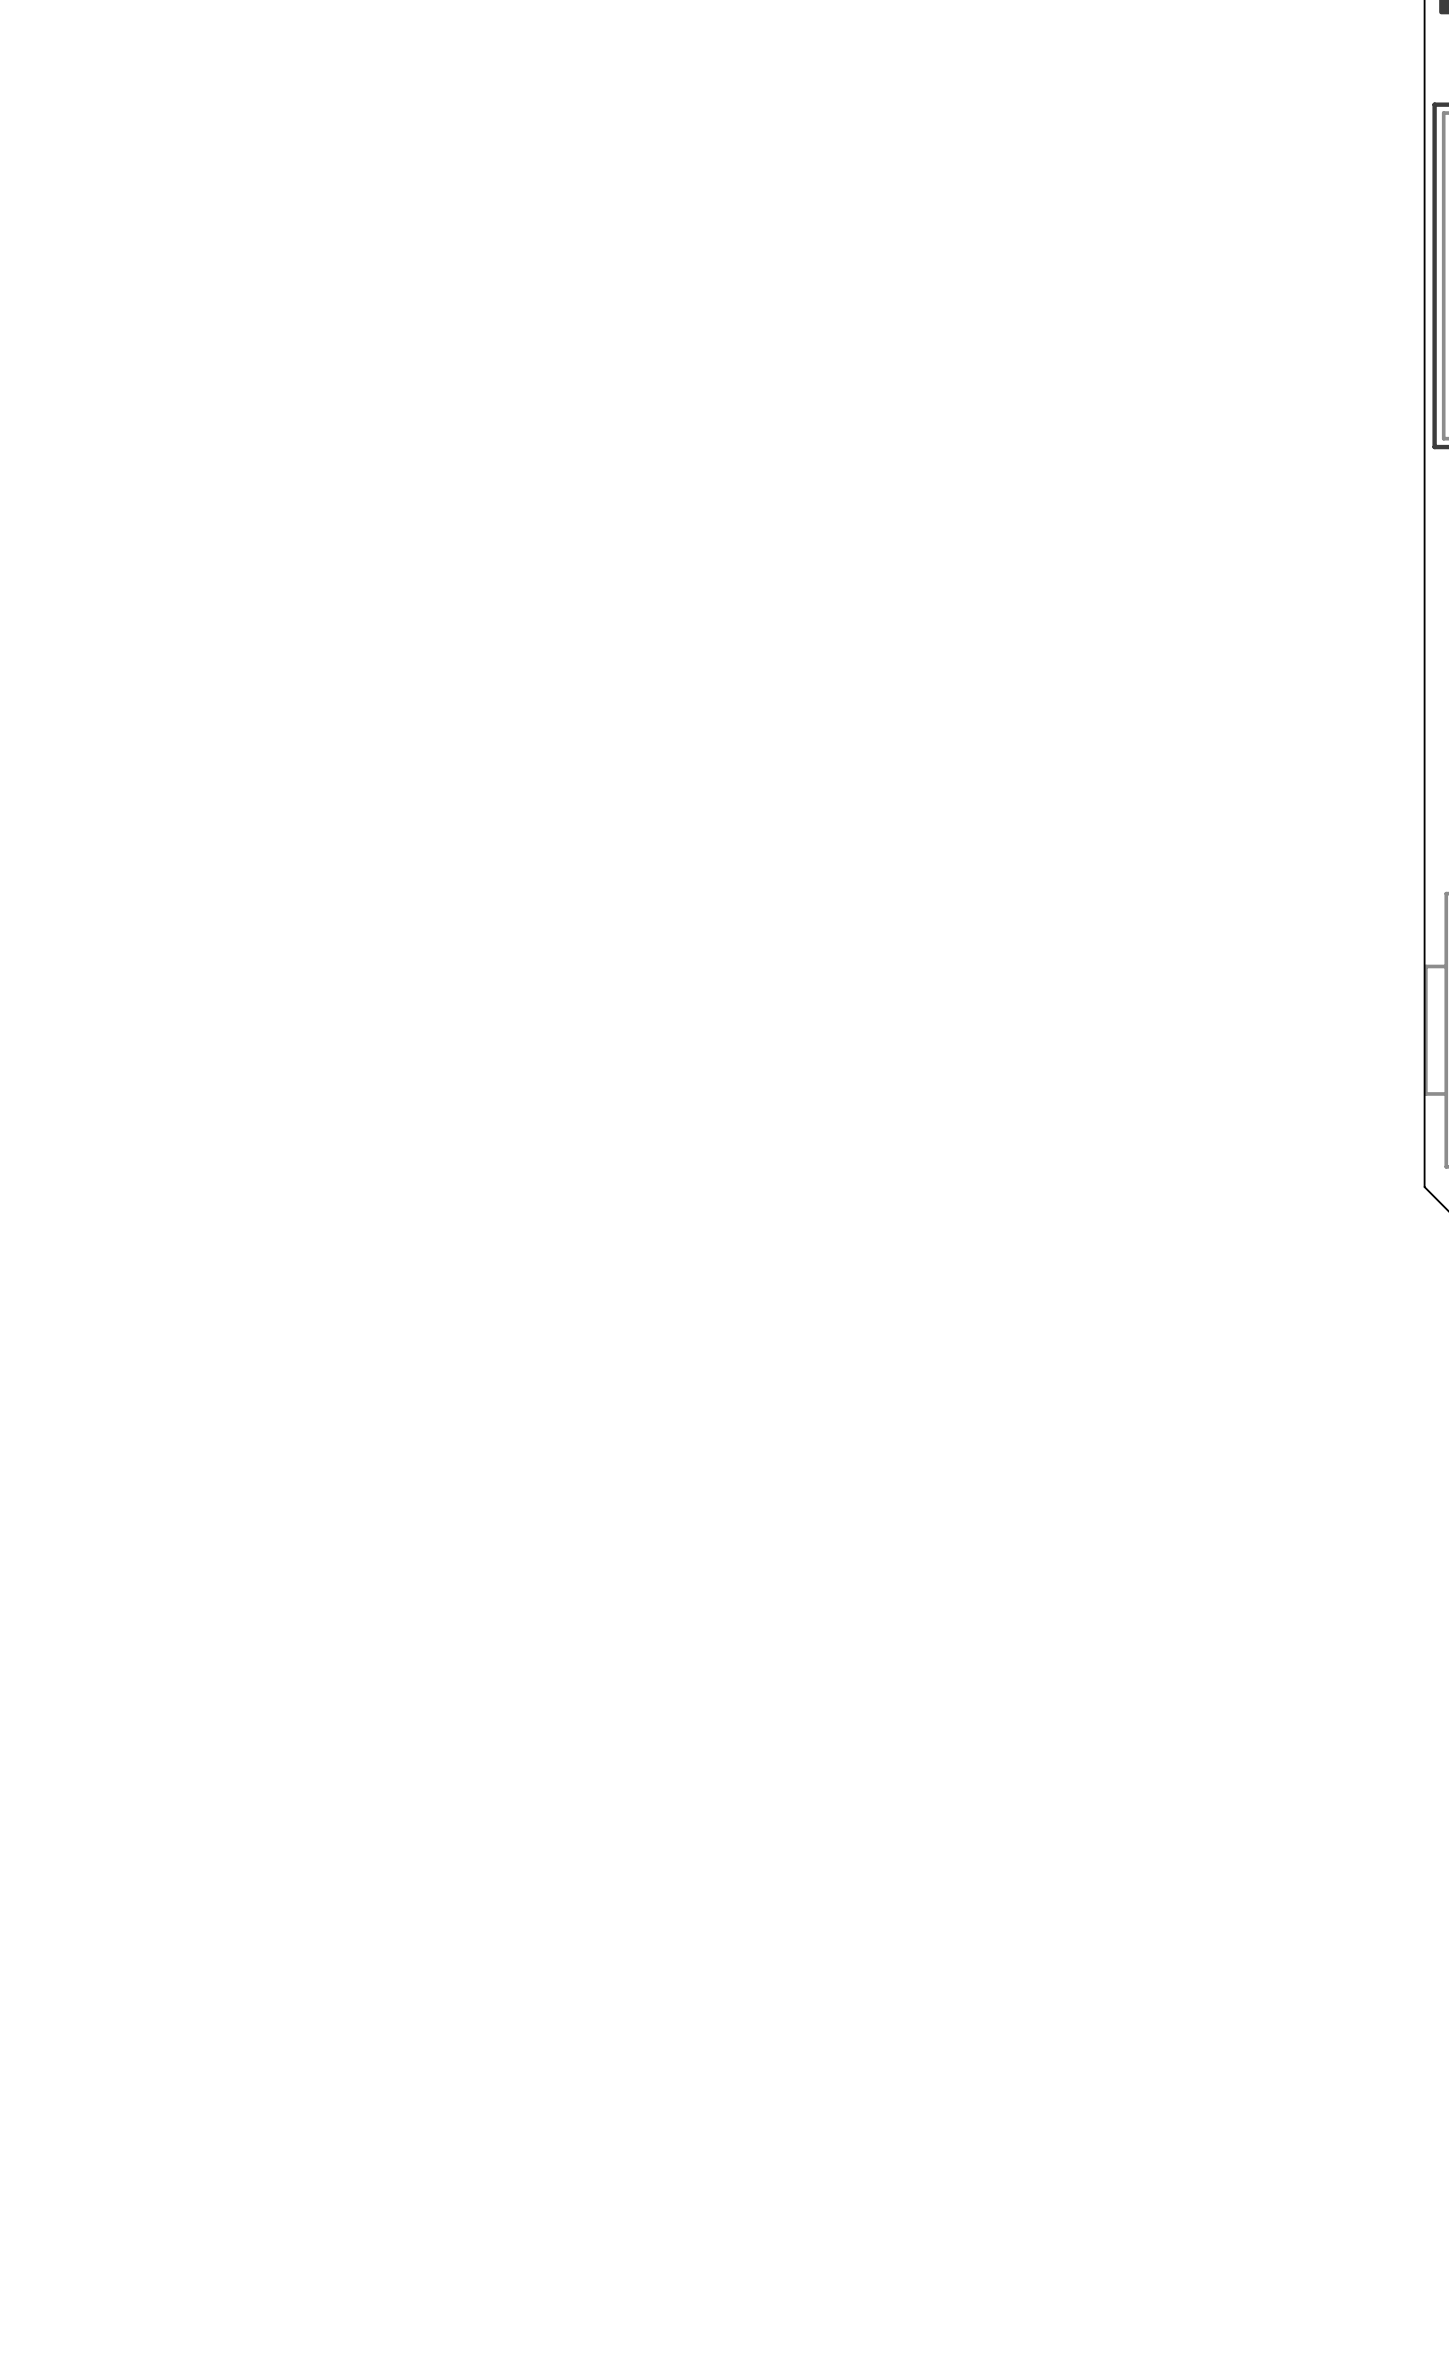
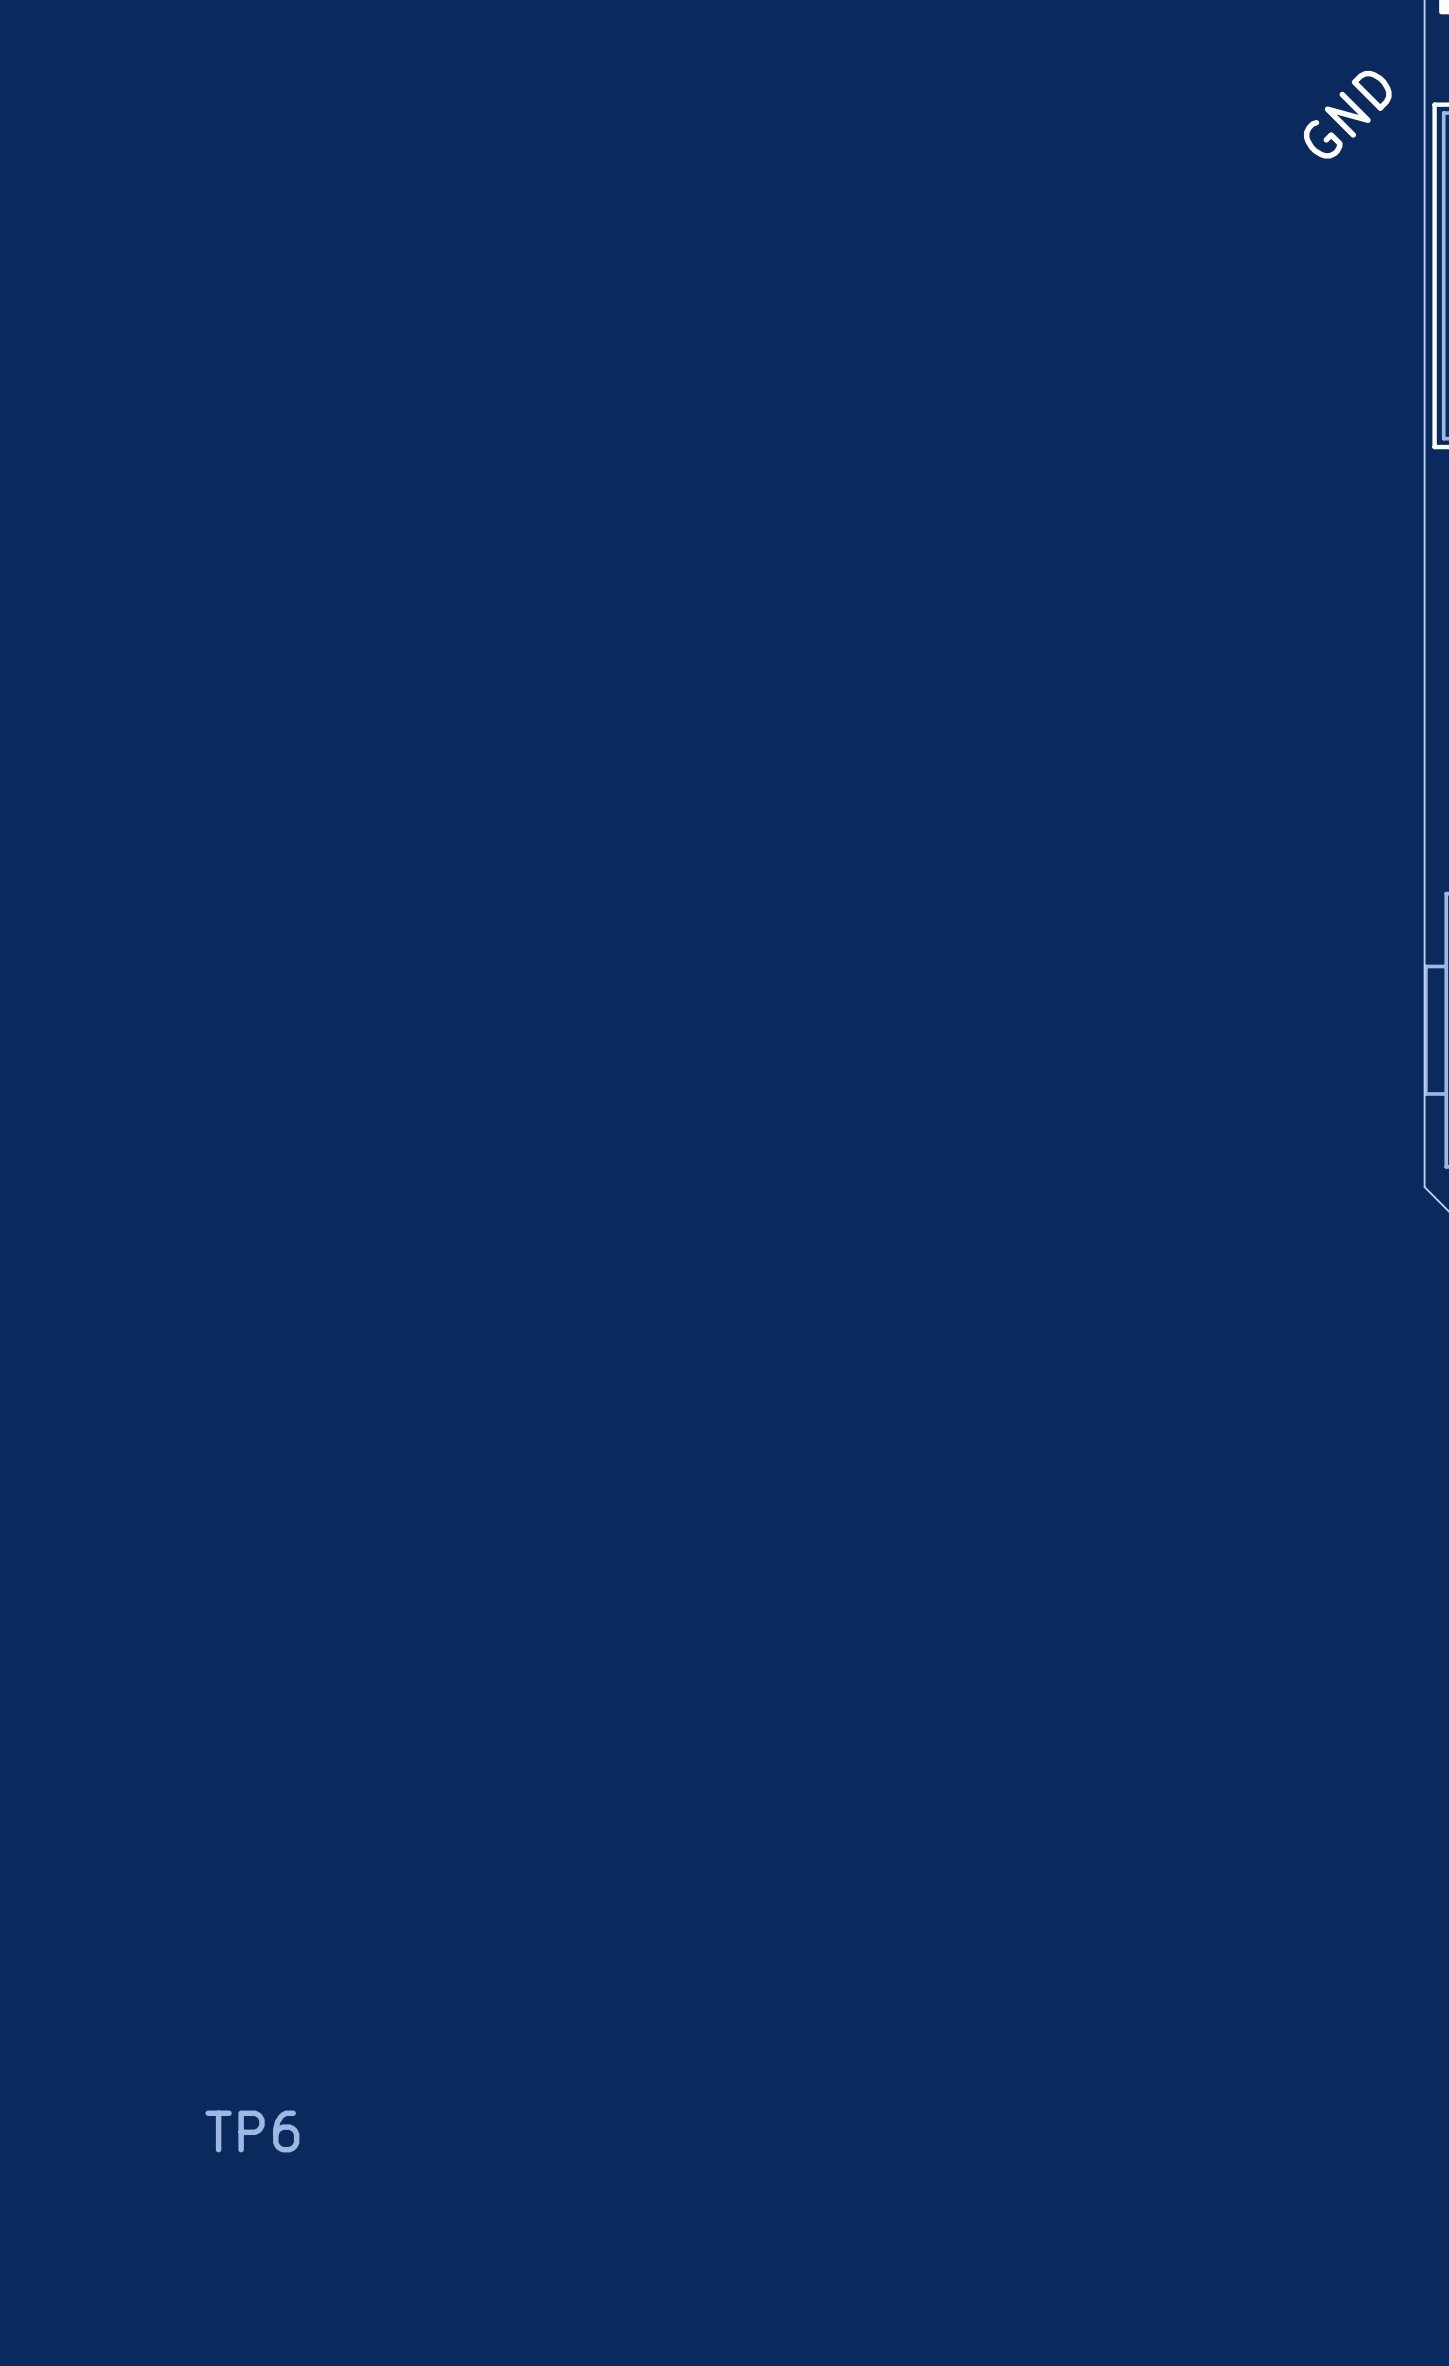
text: none -> GND (1347, 114)
text: none -> TP6 (252, 2131)

